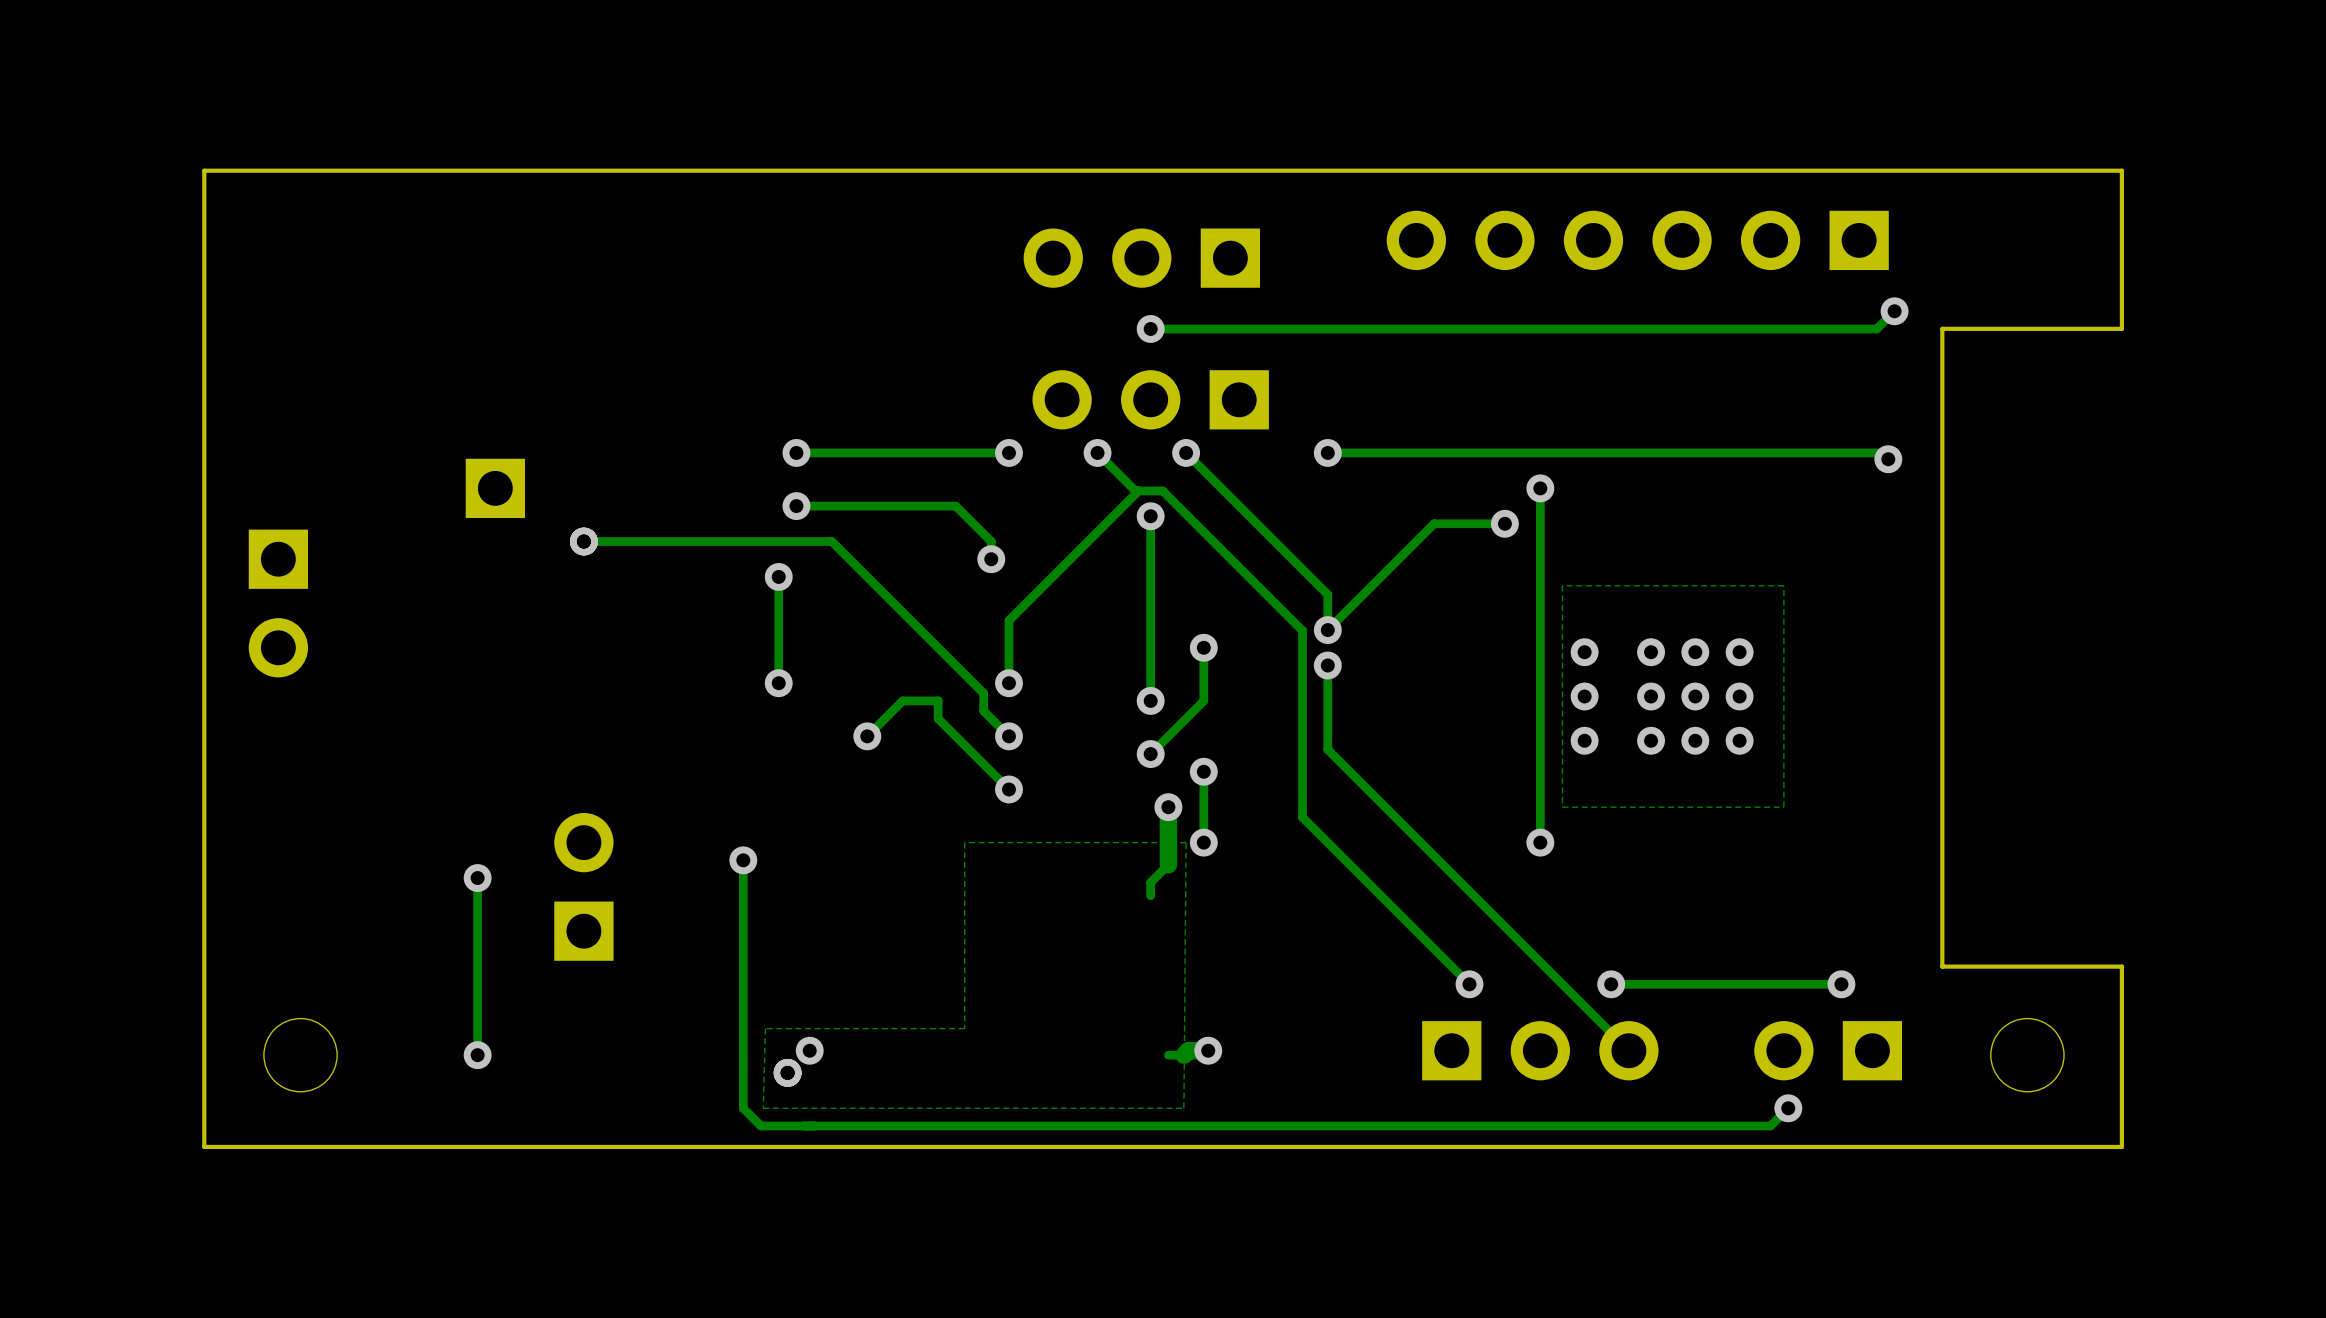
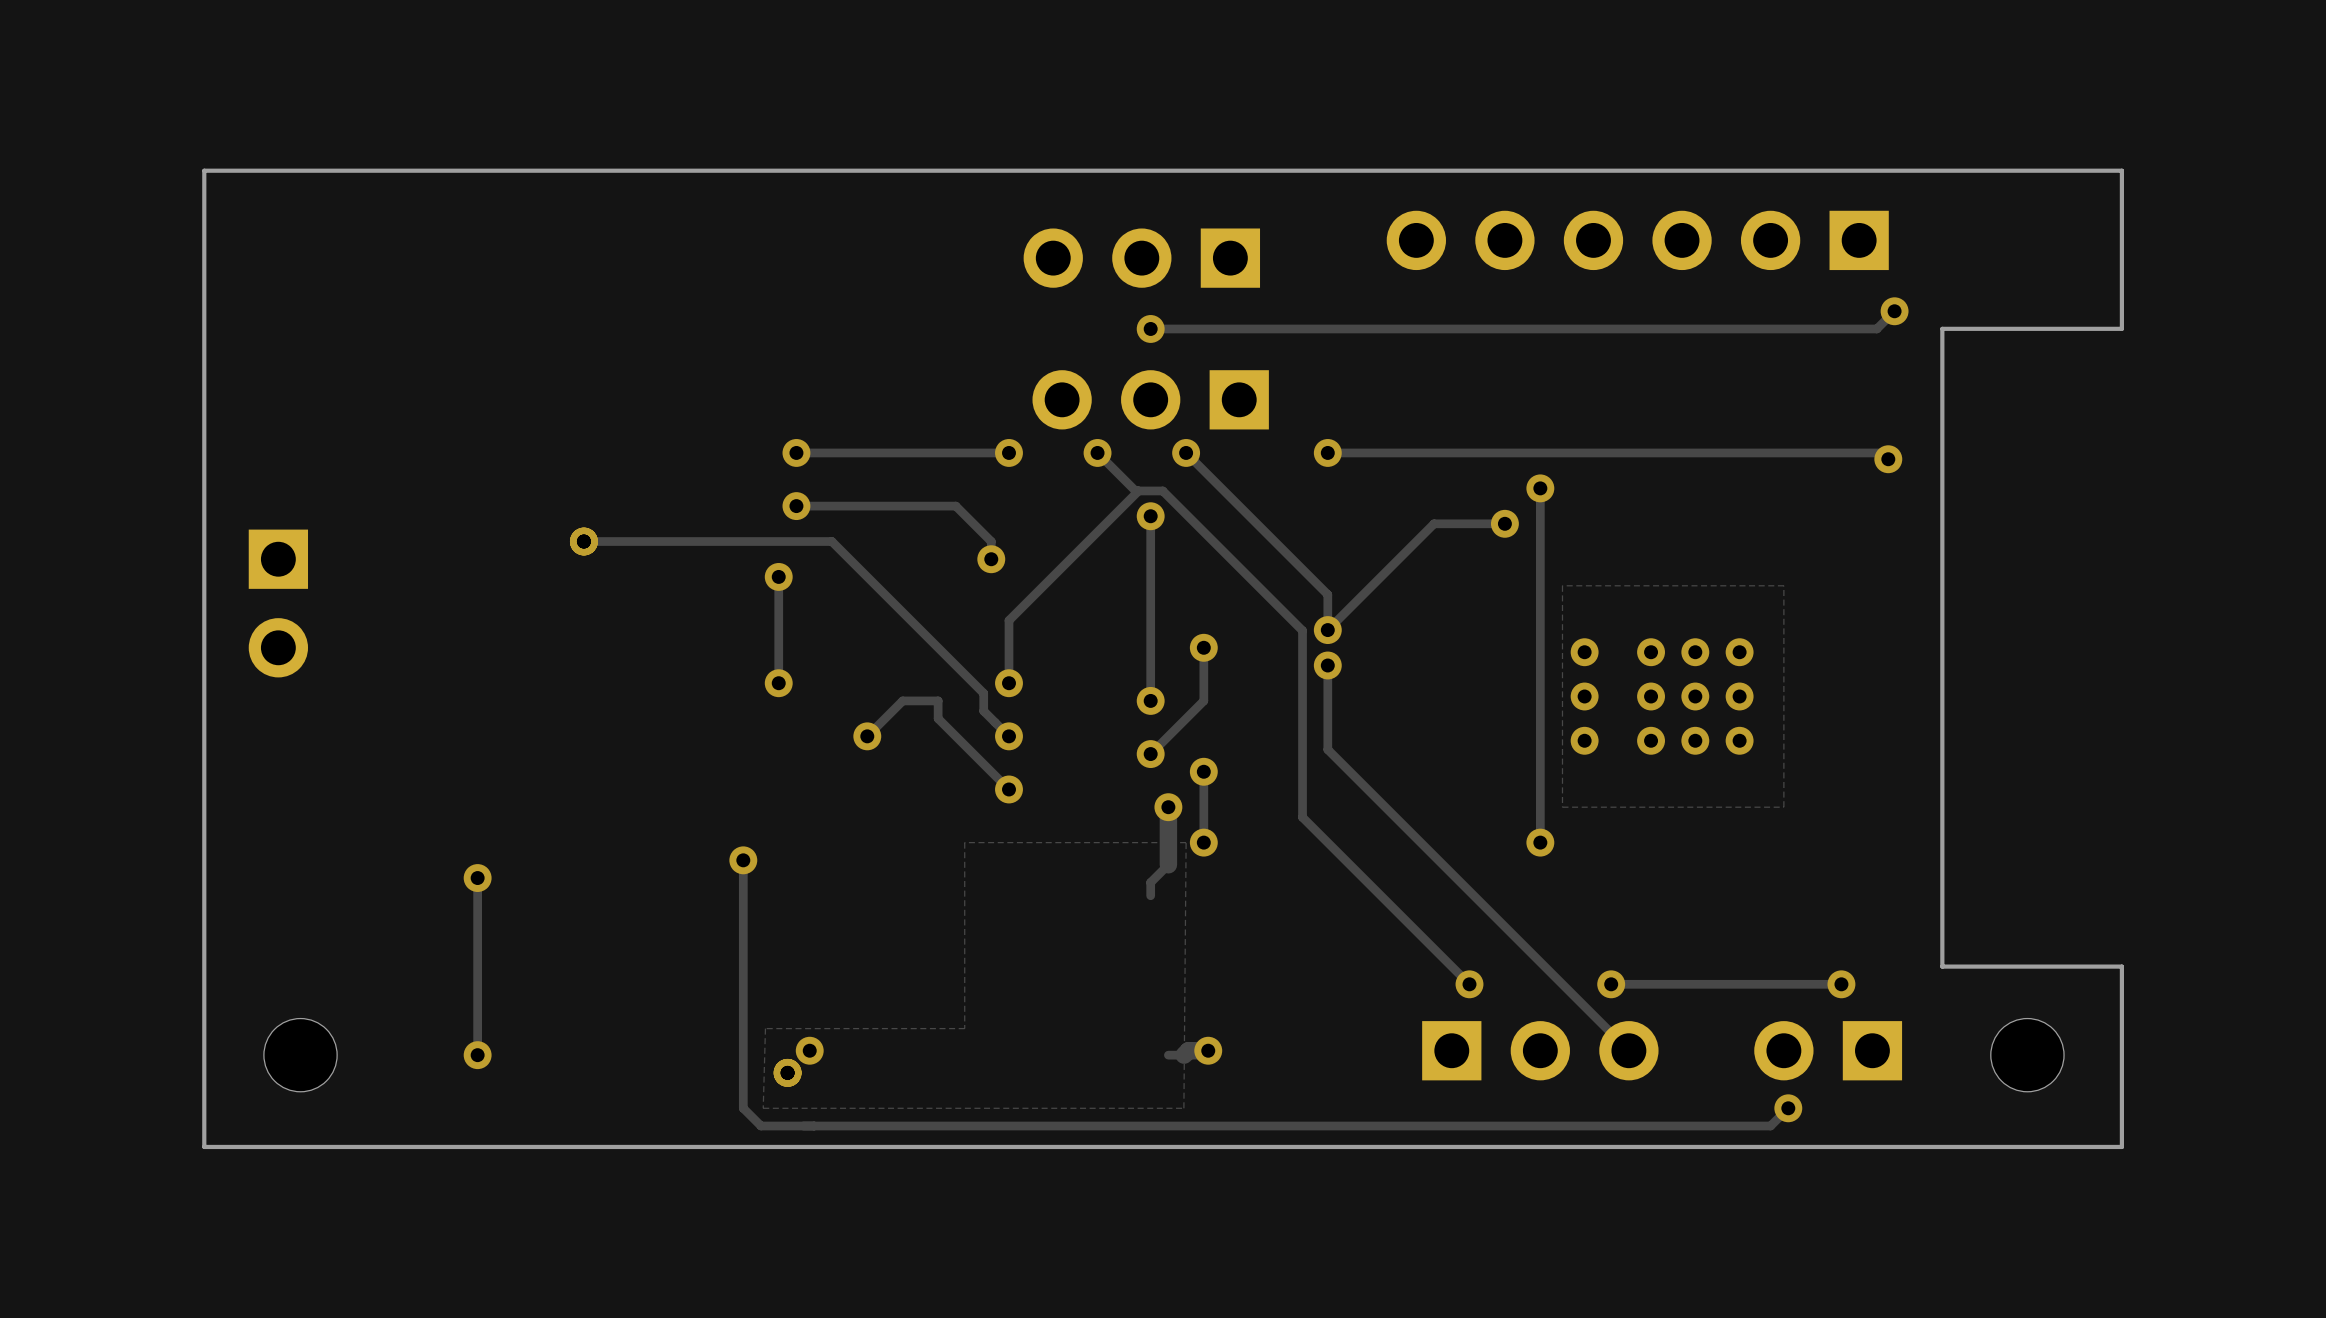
part: (495, 488) -> none
part: (583, 886) -> none

